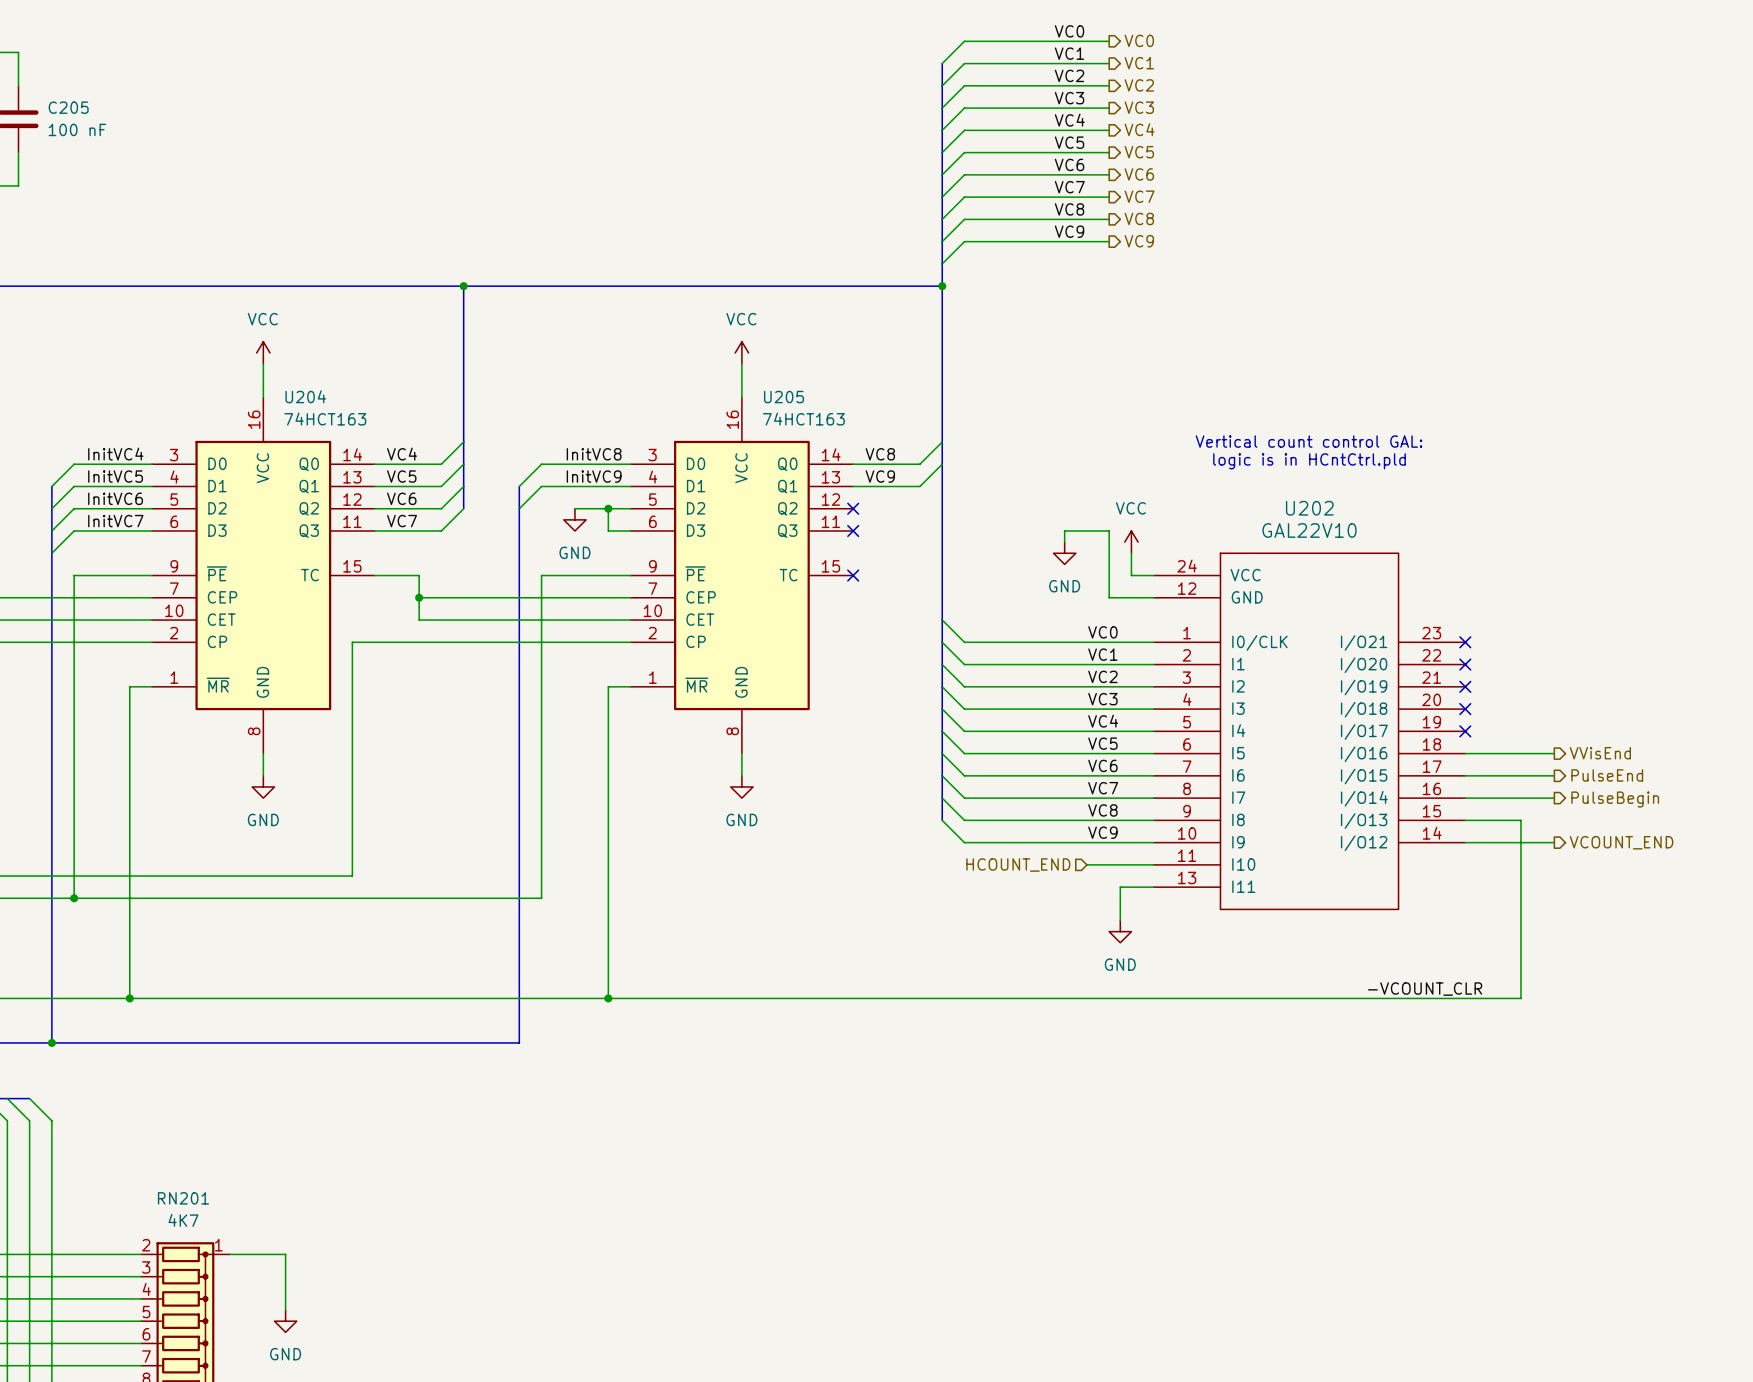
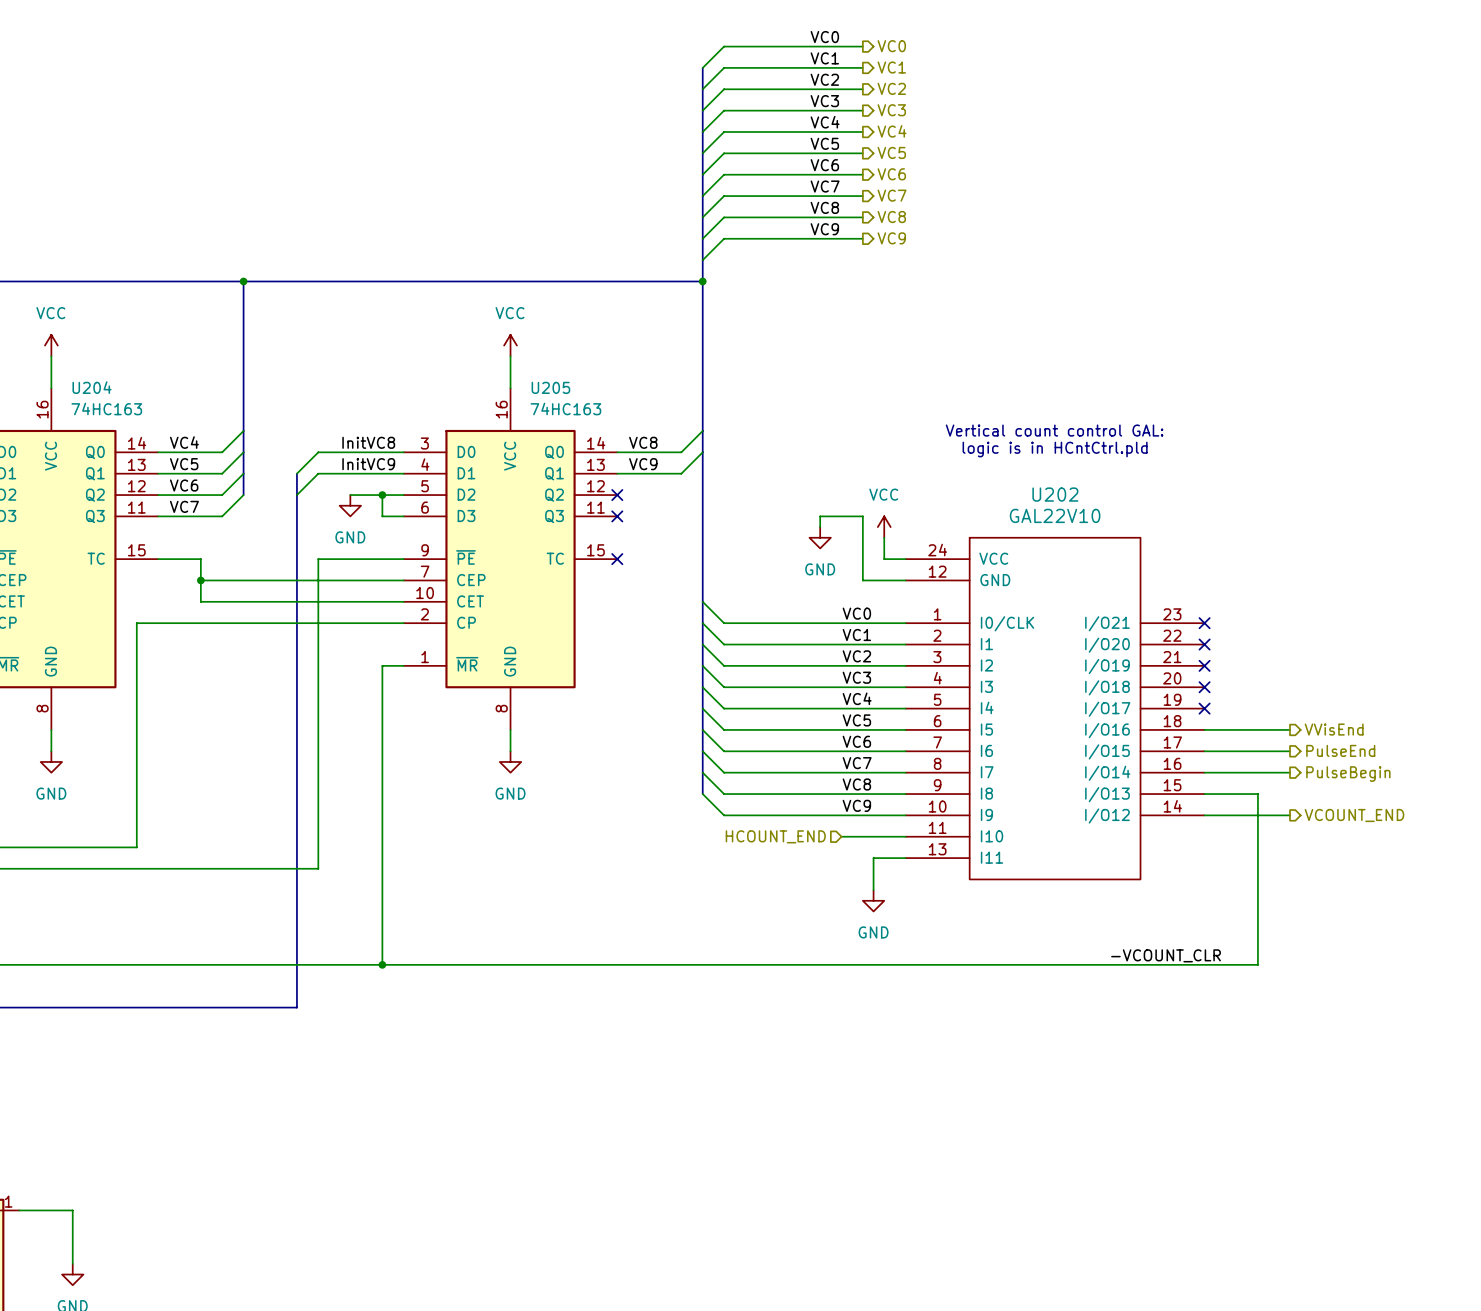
U204 value: 74HCT163 (325, 419) -> 74HC163 (106, 408)
U205 value: 74HCT163 (803, 419) -> 74HC163 (565, 408)

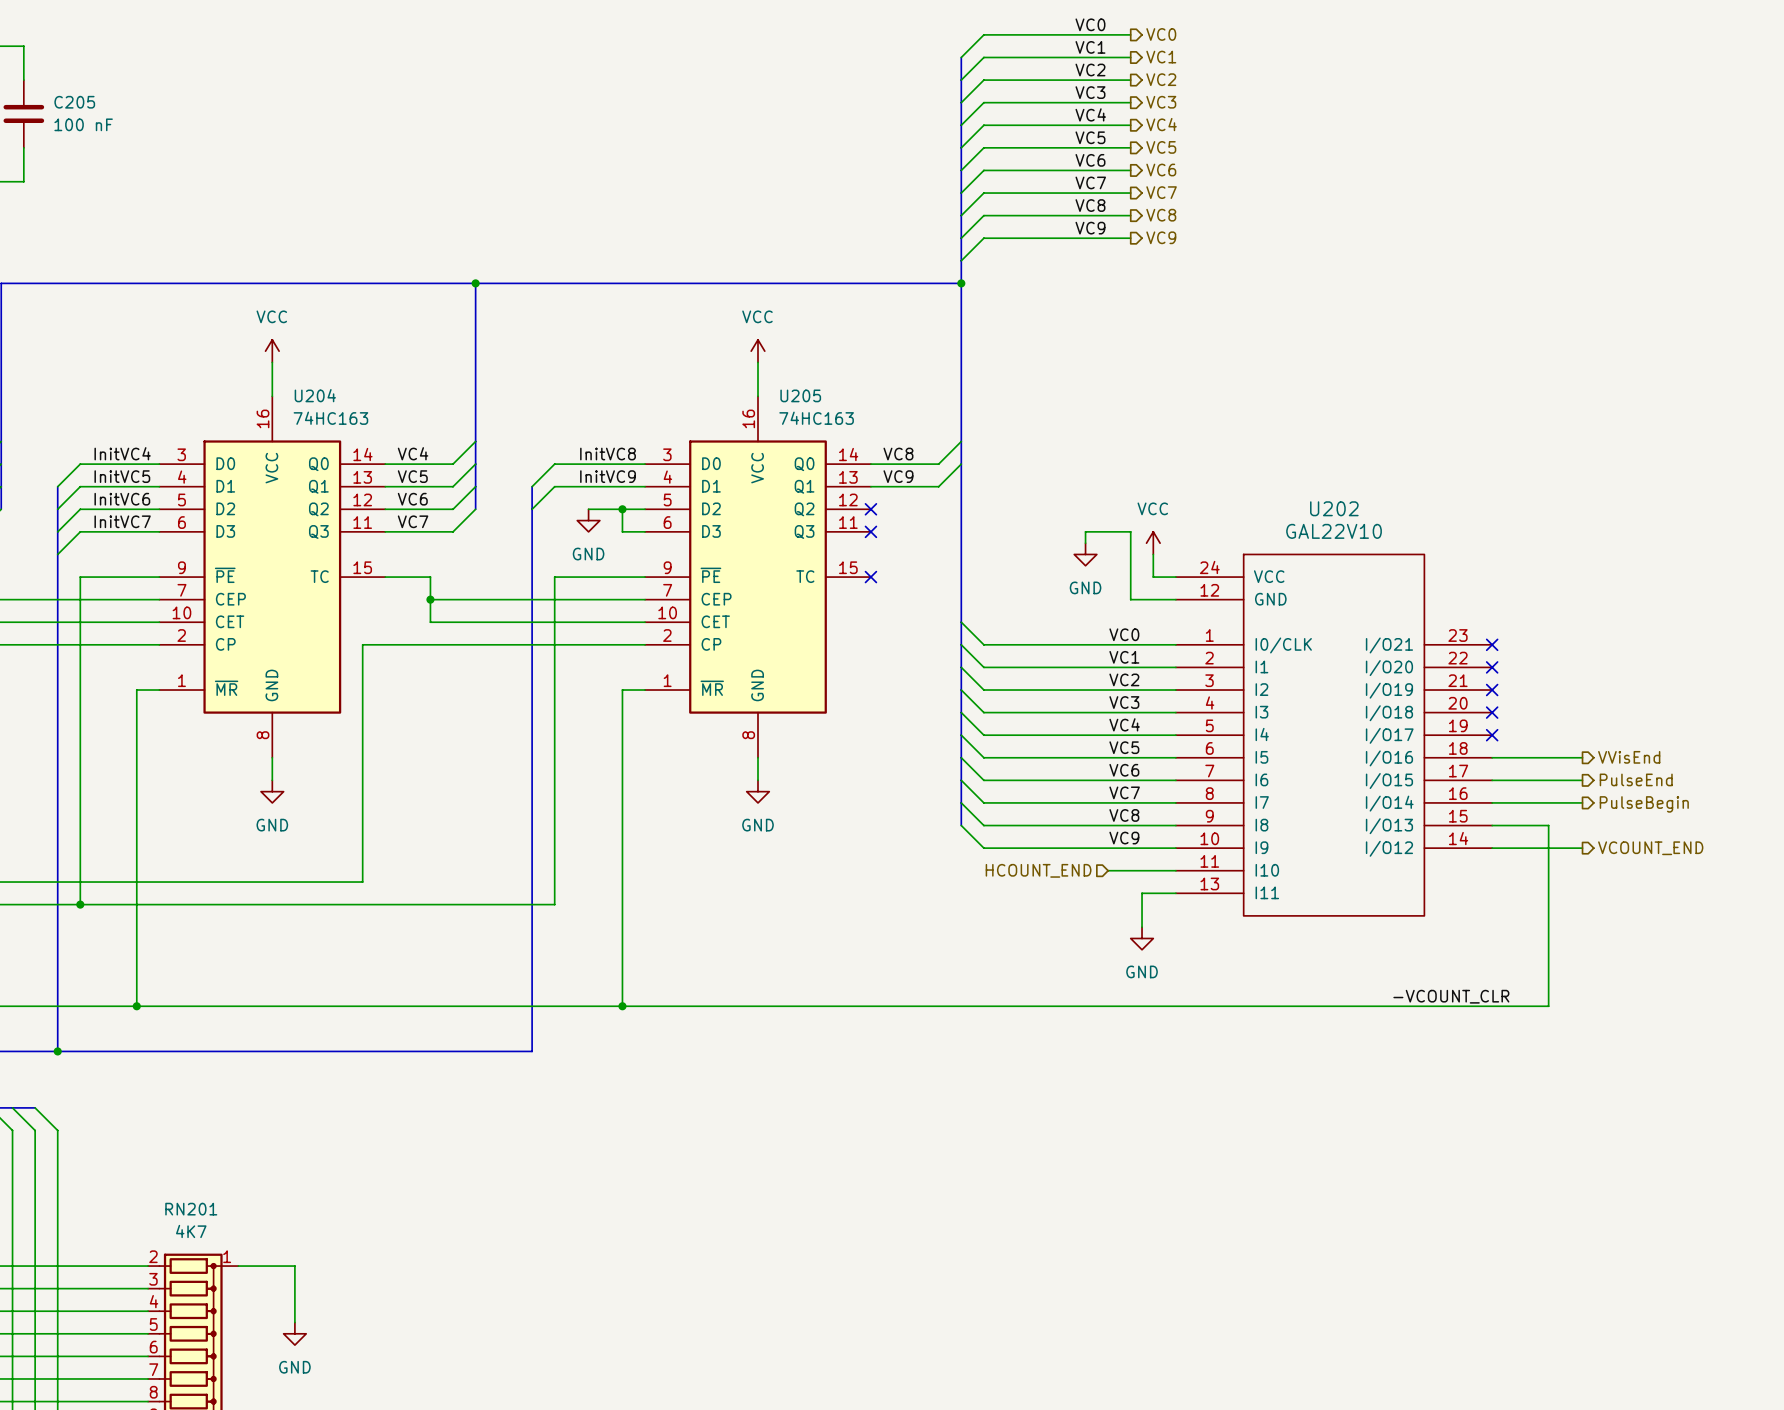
text: Vertical count control GAL: (1054, 430) -> none
text: logic is in HCntCtrl.pld (1055, 449) -> none

